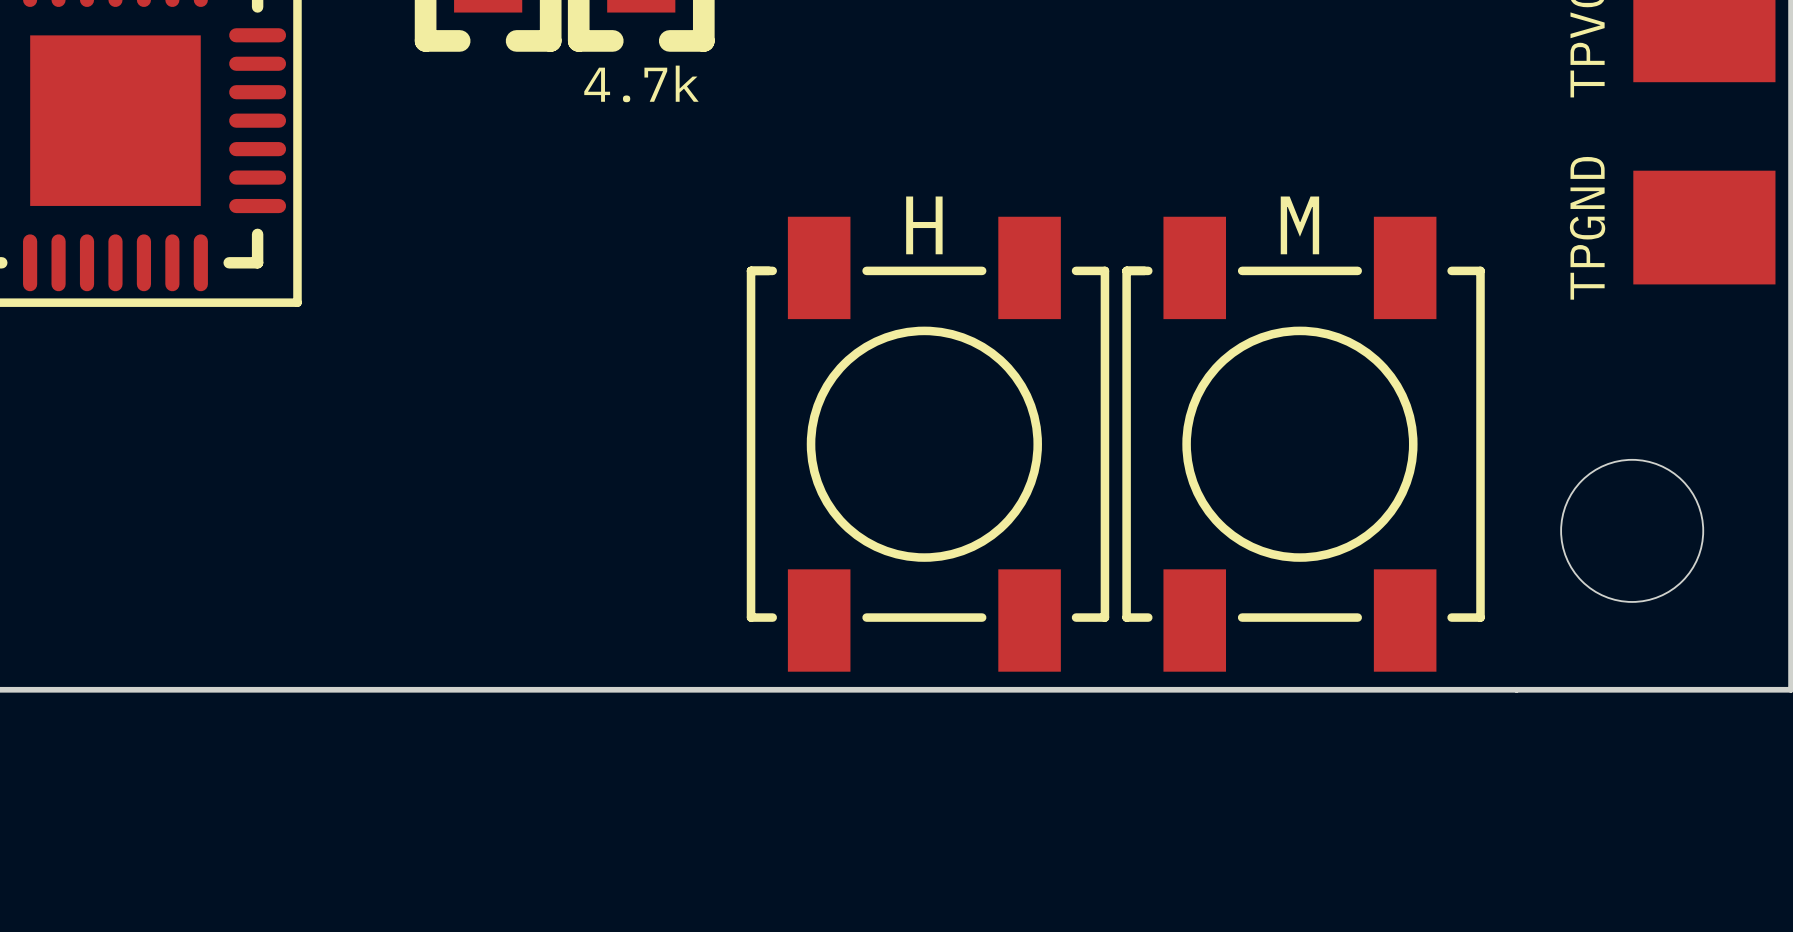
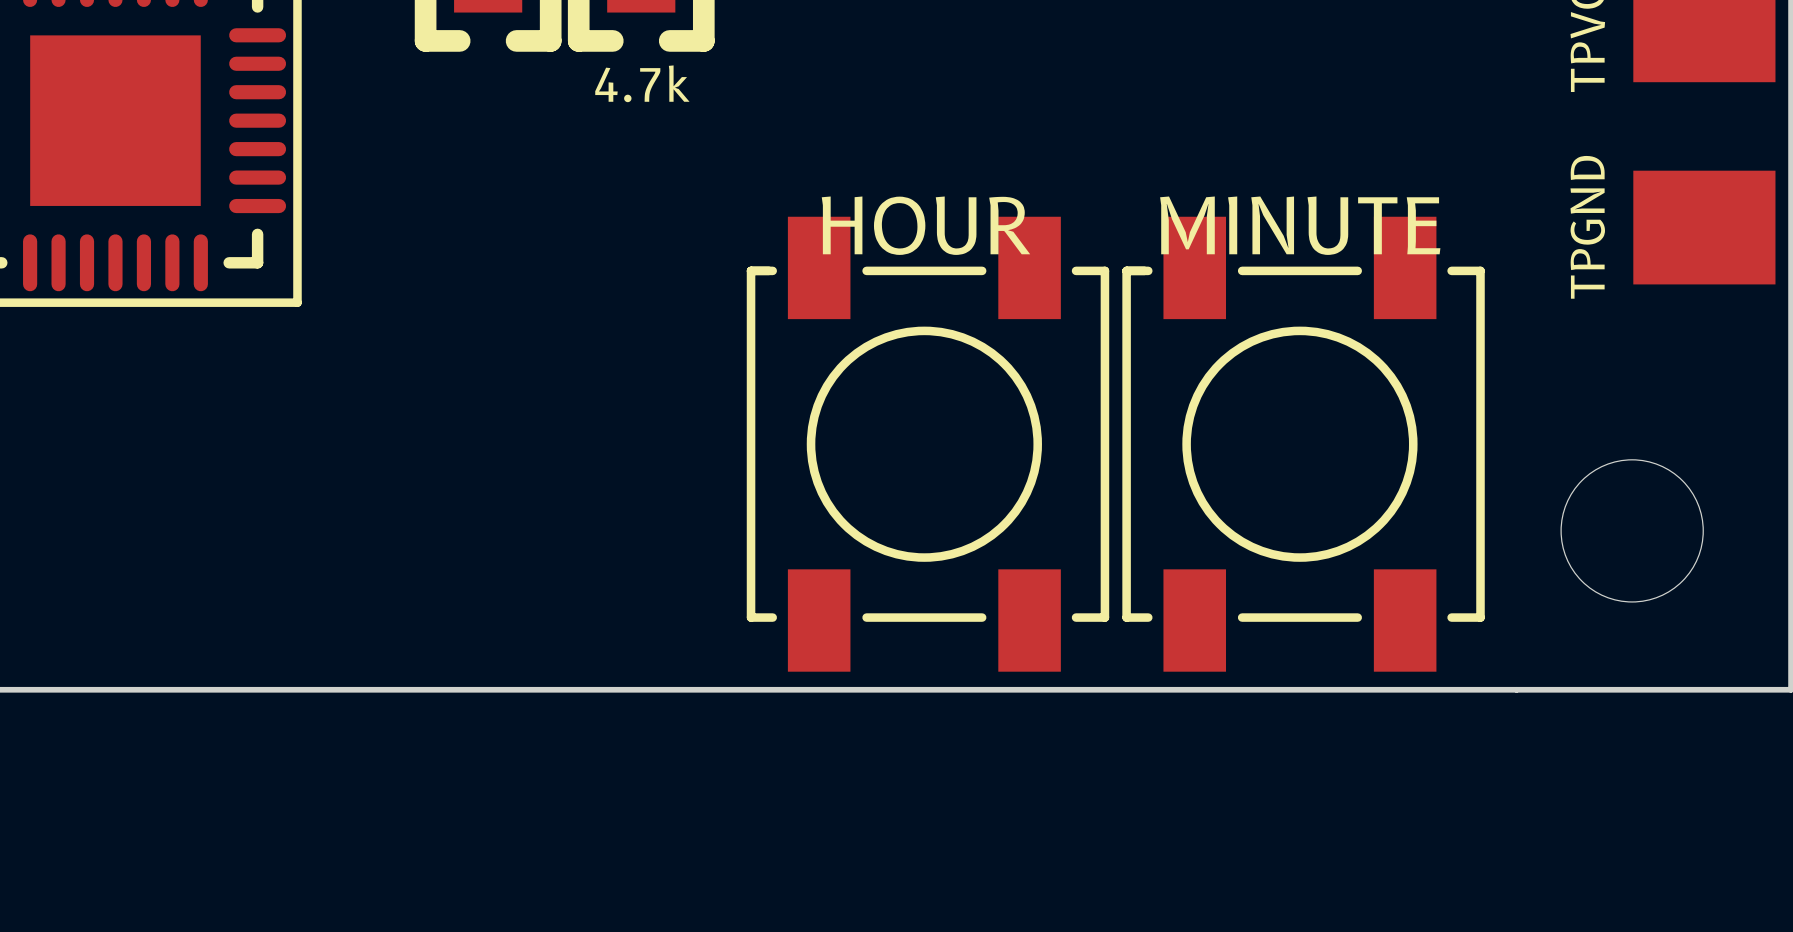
part value: H (924, 225) -> HOUR (925, 225)
part value: M (1299, 225) -> MINUTE (1300, 225)

